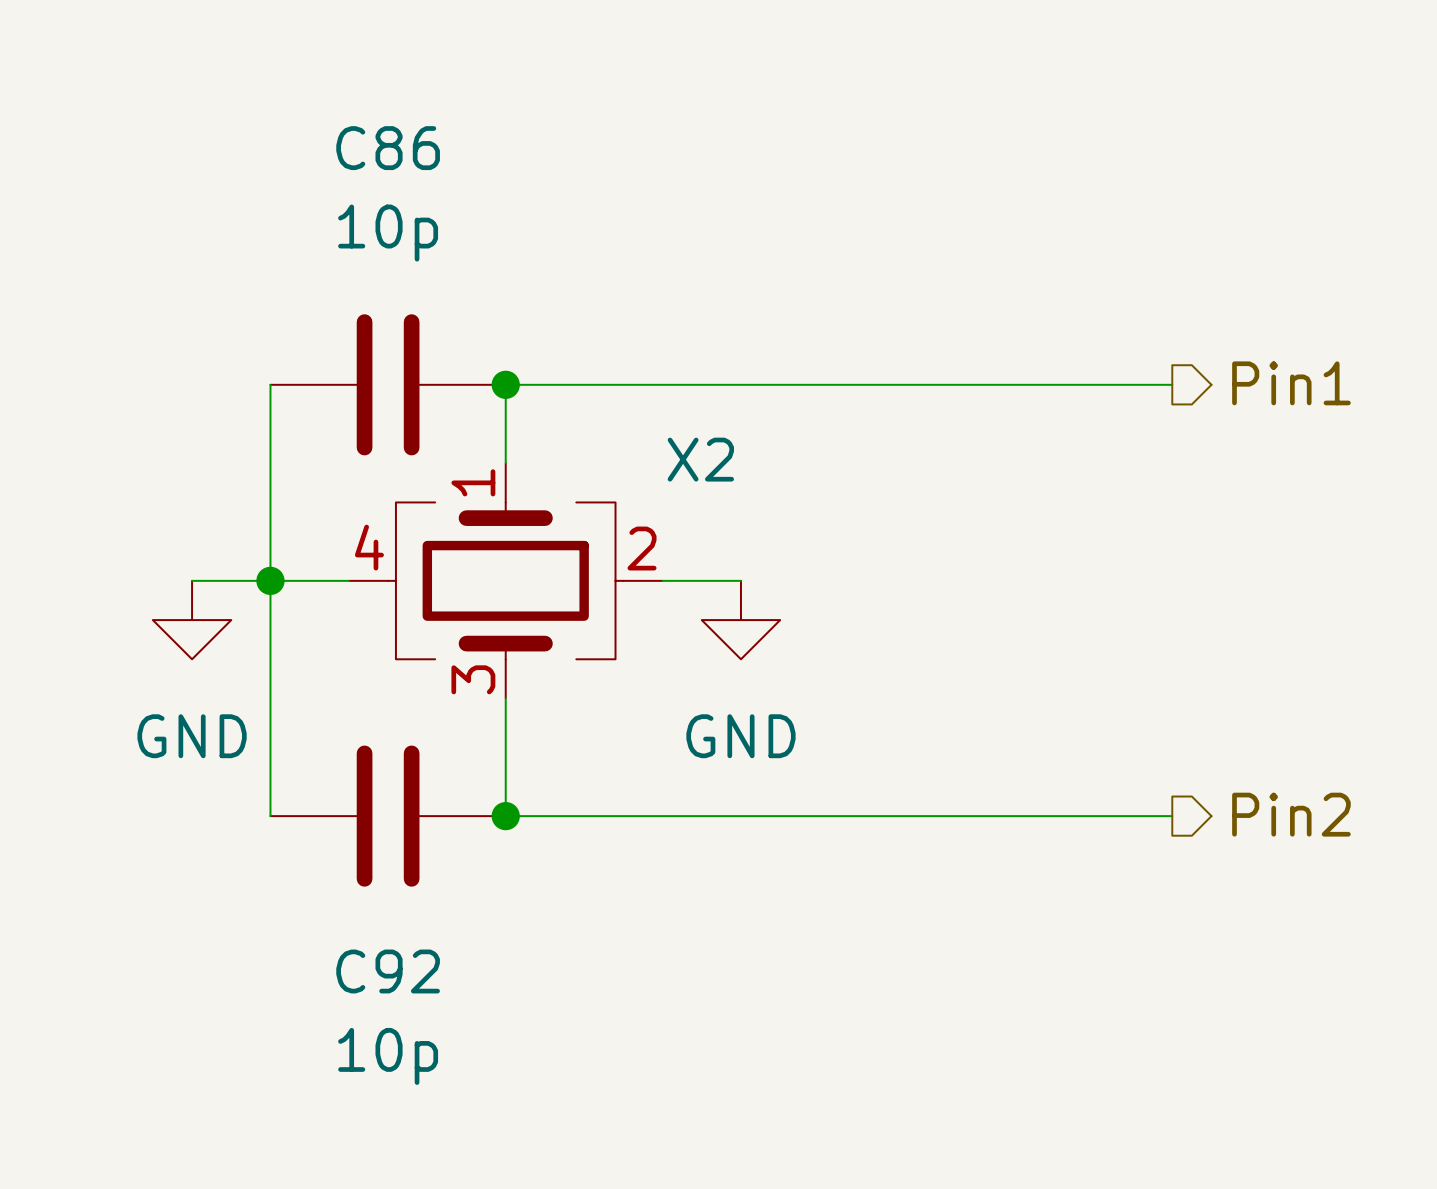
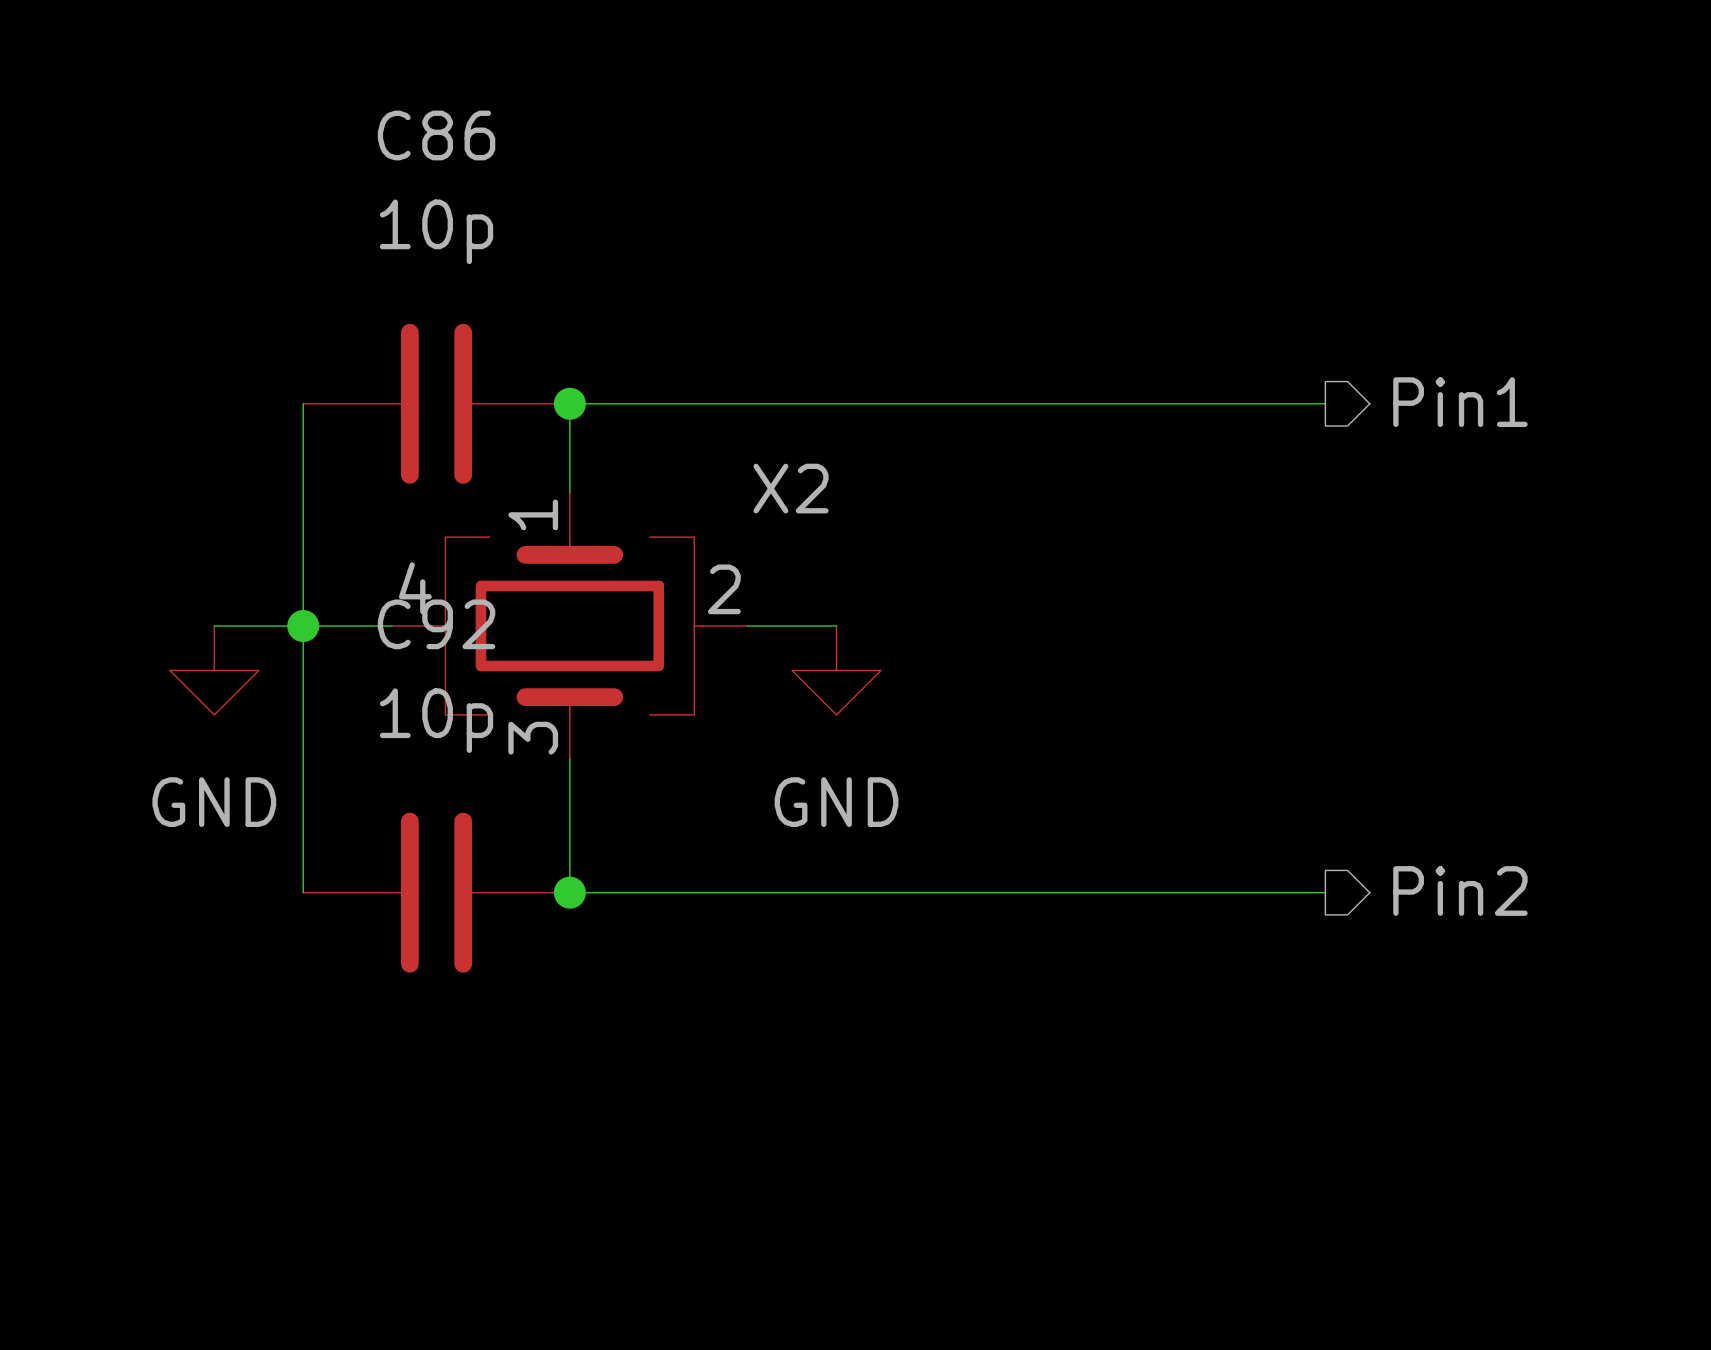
C92 name position: C92 (388, 971) -> C92 (436, 624)
C92 value position: 10p (388, 1056) -> 10p (436, 720)

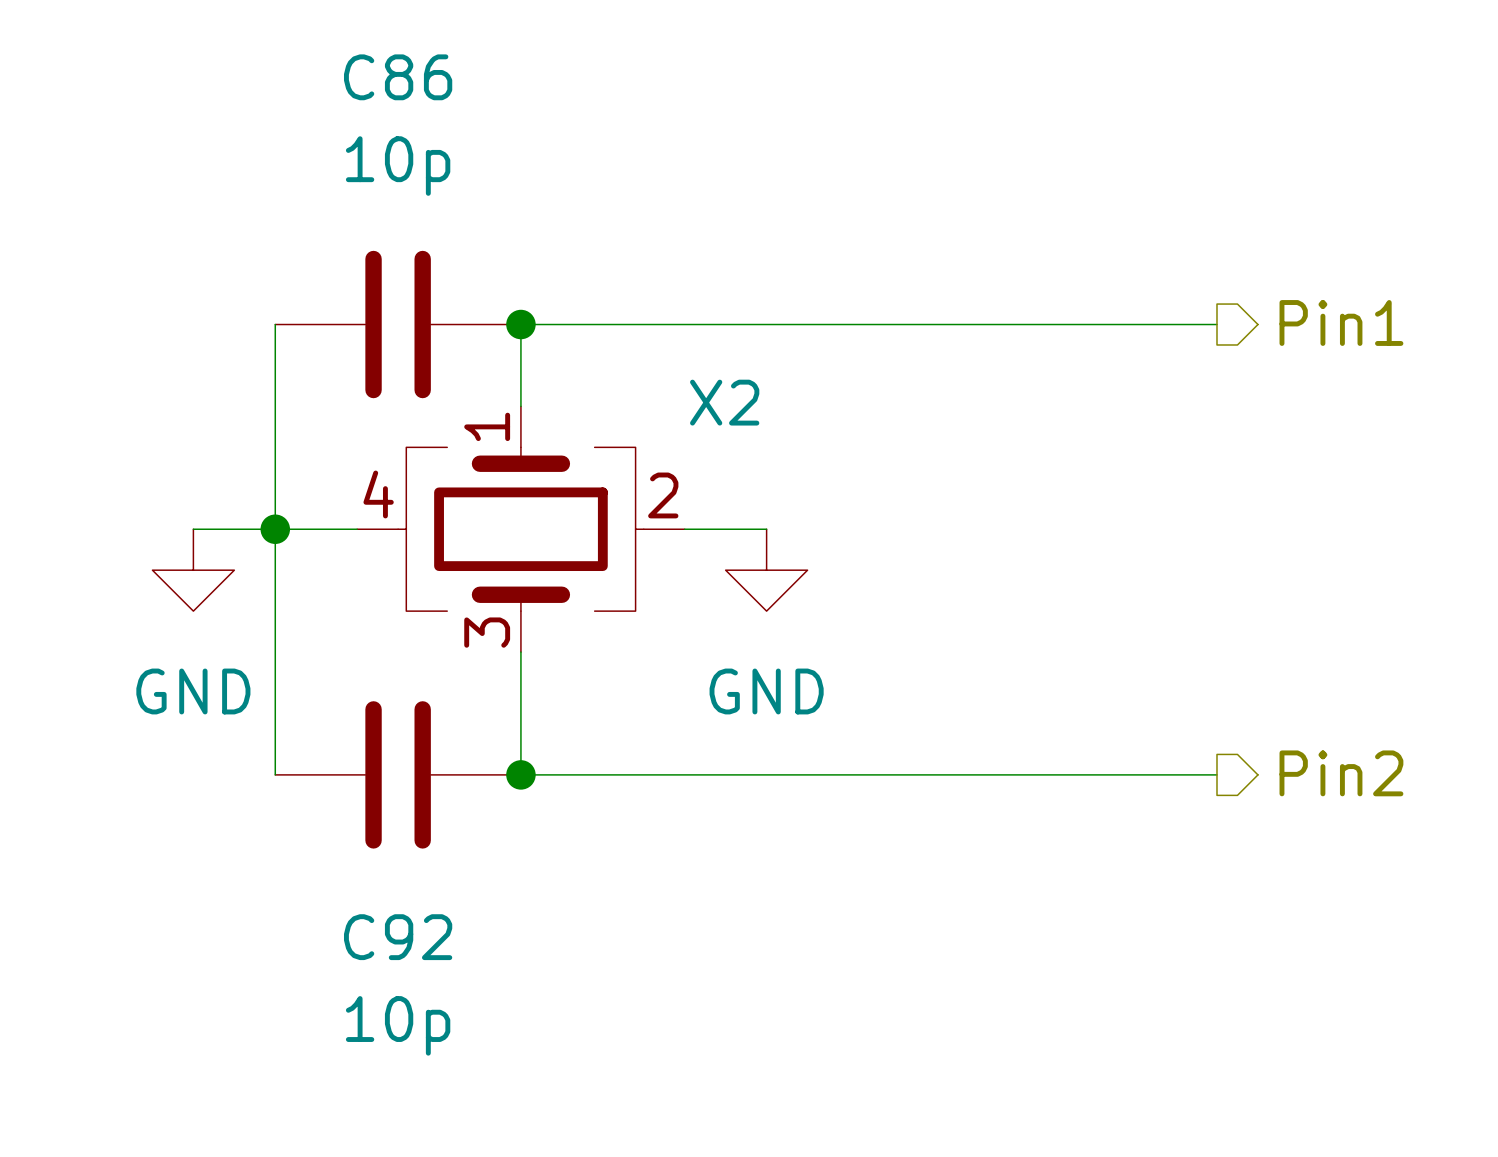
C92 name position: C92 (436, 624) -> C92 (398, 937)
C92 value position: 10p (436, 720) -> 10p (398, 1025)

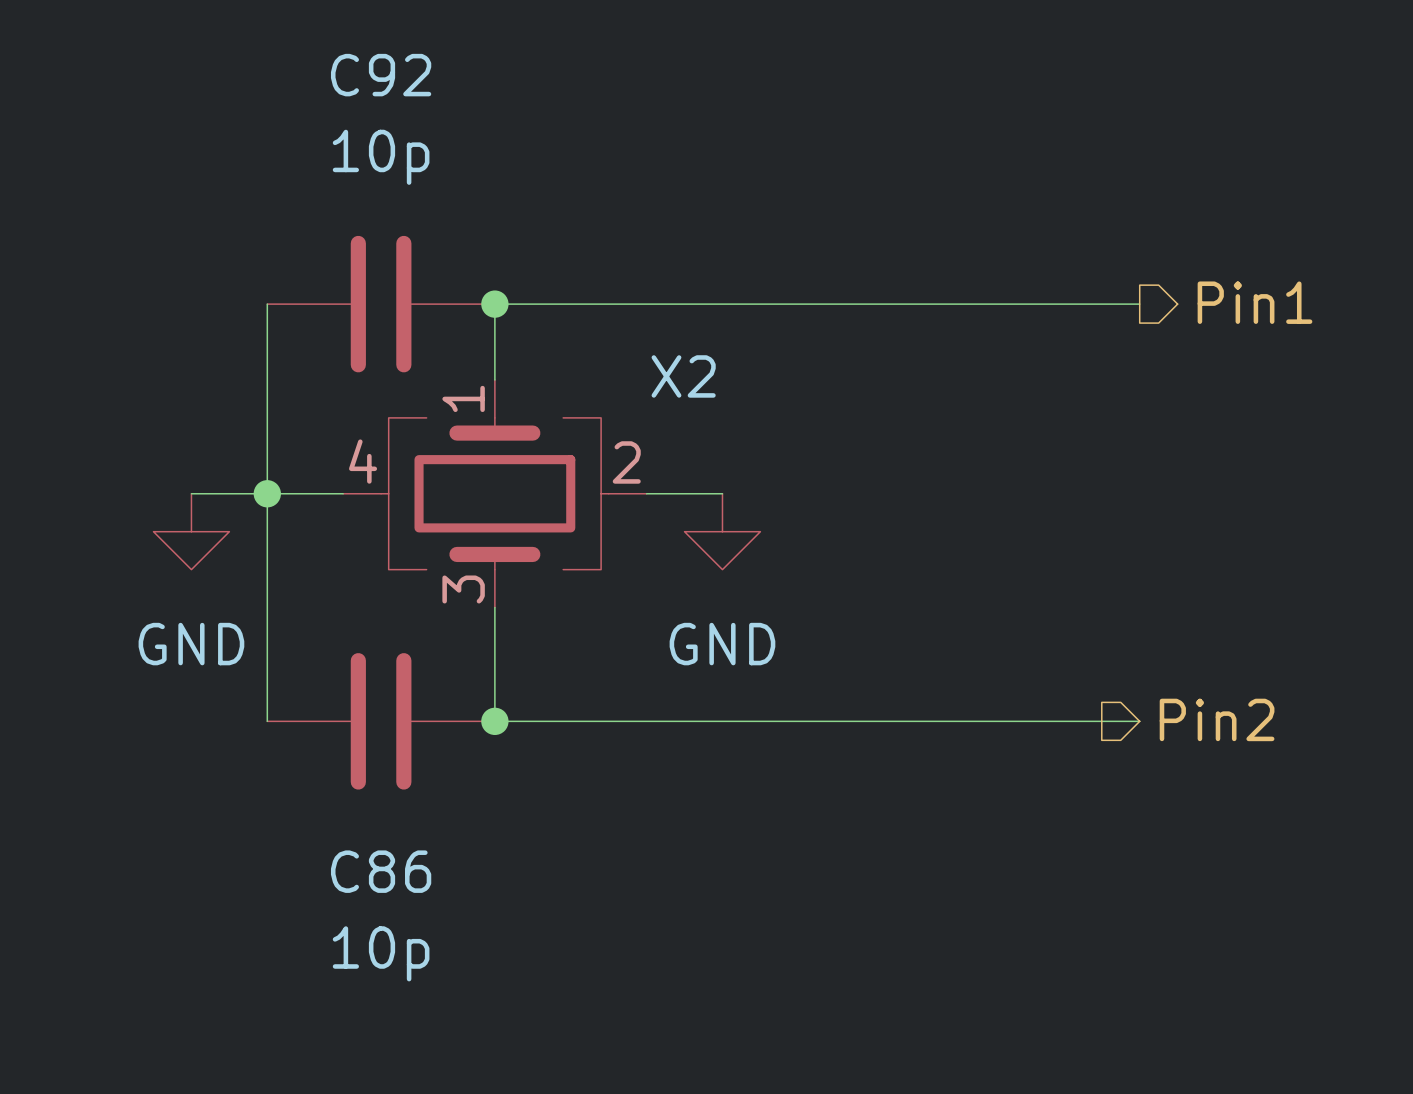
C86 name: C86 (398, 77) -> C92 (381, 75)
hierarchical label position: Pin2 (1341, 773) -> Pin2 (1217, 719)
C92 name: C92 (398, 937) -> C86 (381, 871)

